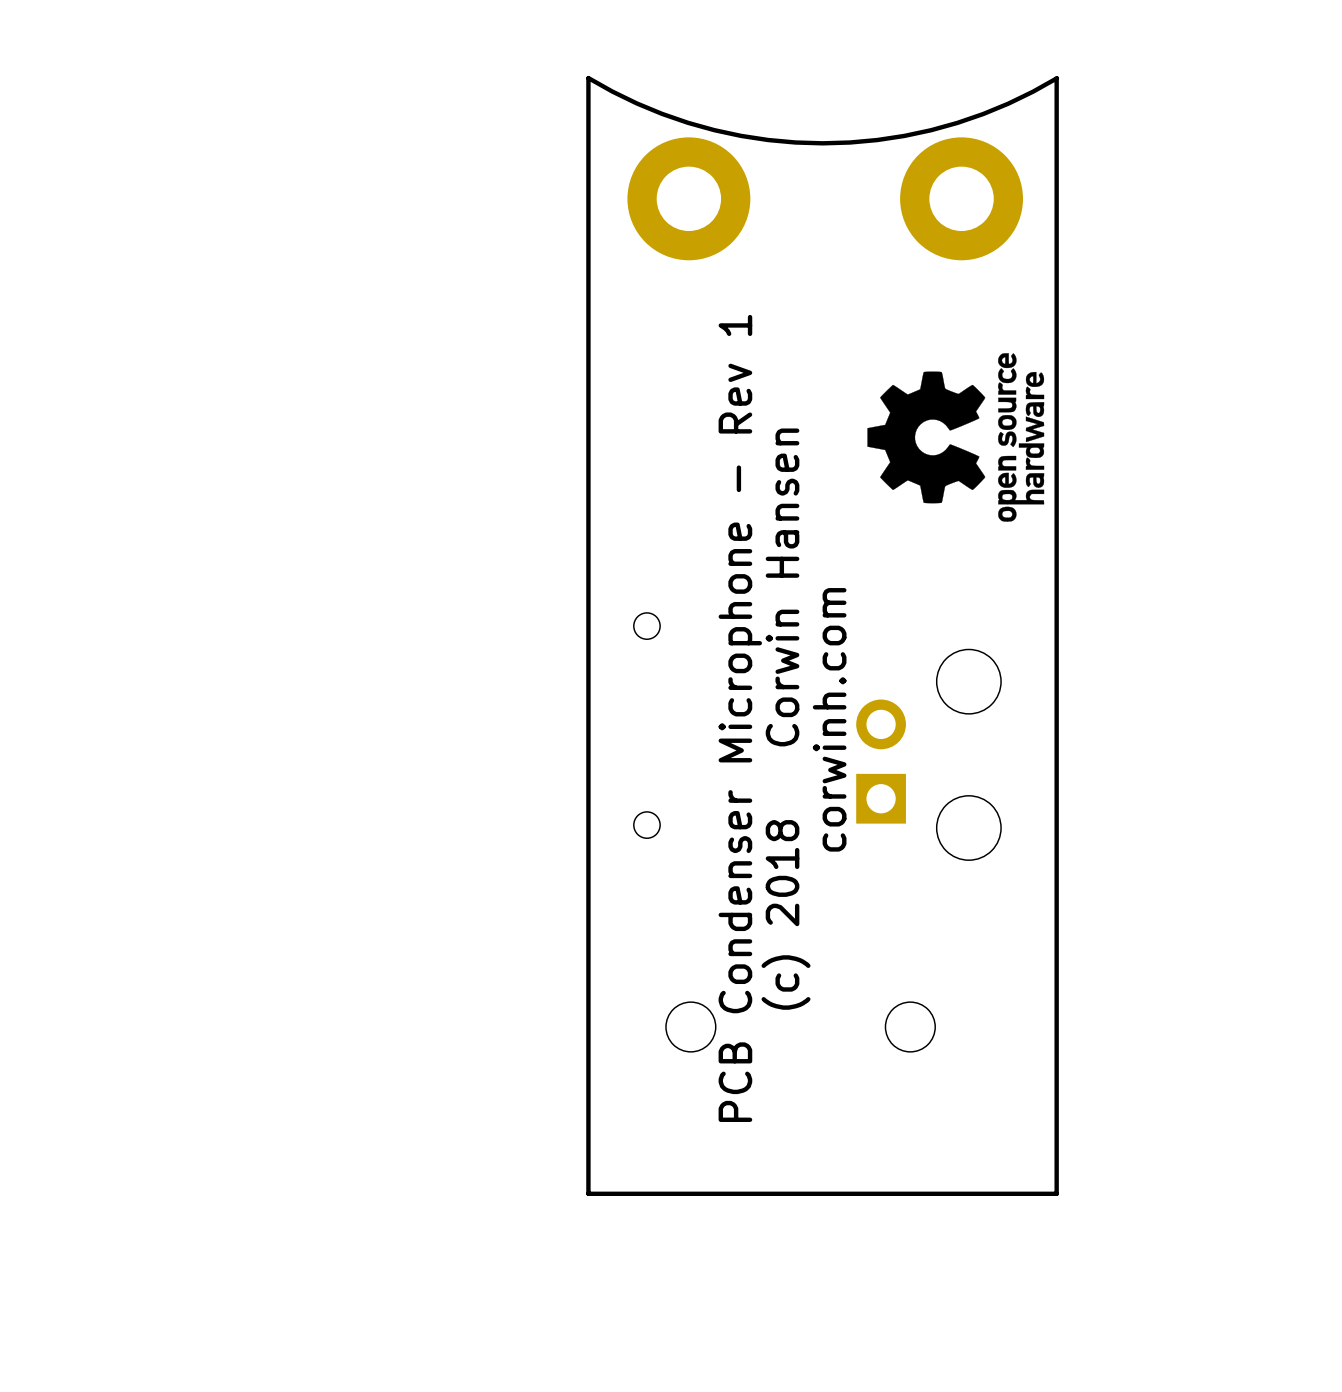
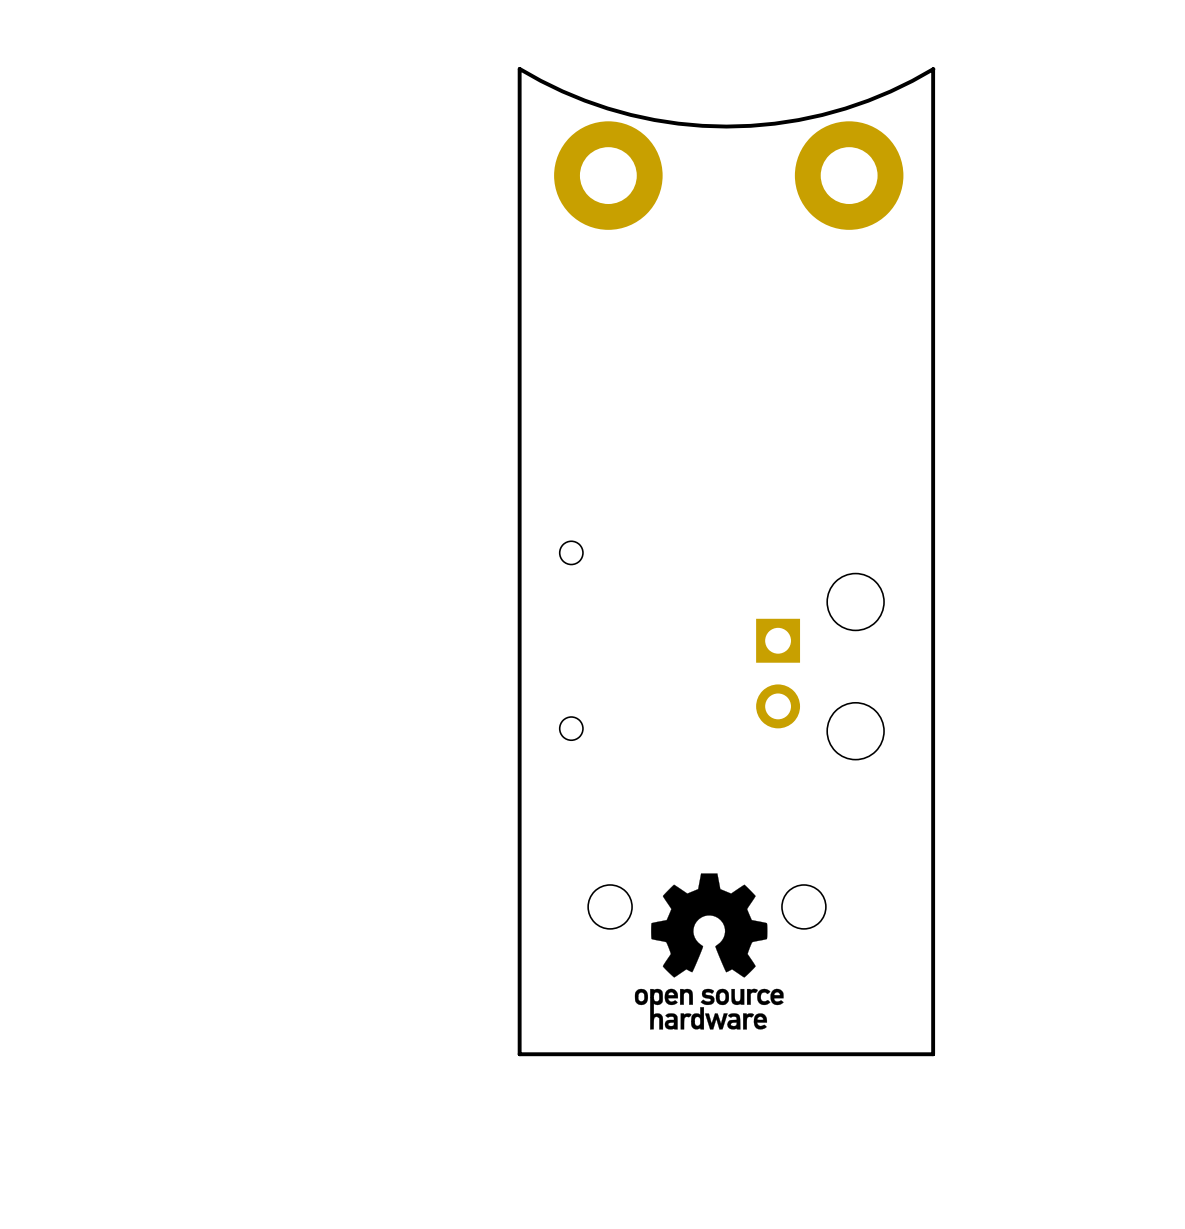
drawing: [867, 353, 1045, 522] -> none
text: PCB Condenser Microphone - Rev 1 (740, 718) -> none
text: (c) 2018 Corwin Hansen (786, 719) -> none
text: corwinh.com (829, 719) -> none
part rotation: 0° (881, 761) -> 180° (778, 673)
drawing: none -> [634, 873, 784, 1030]

